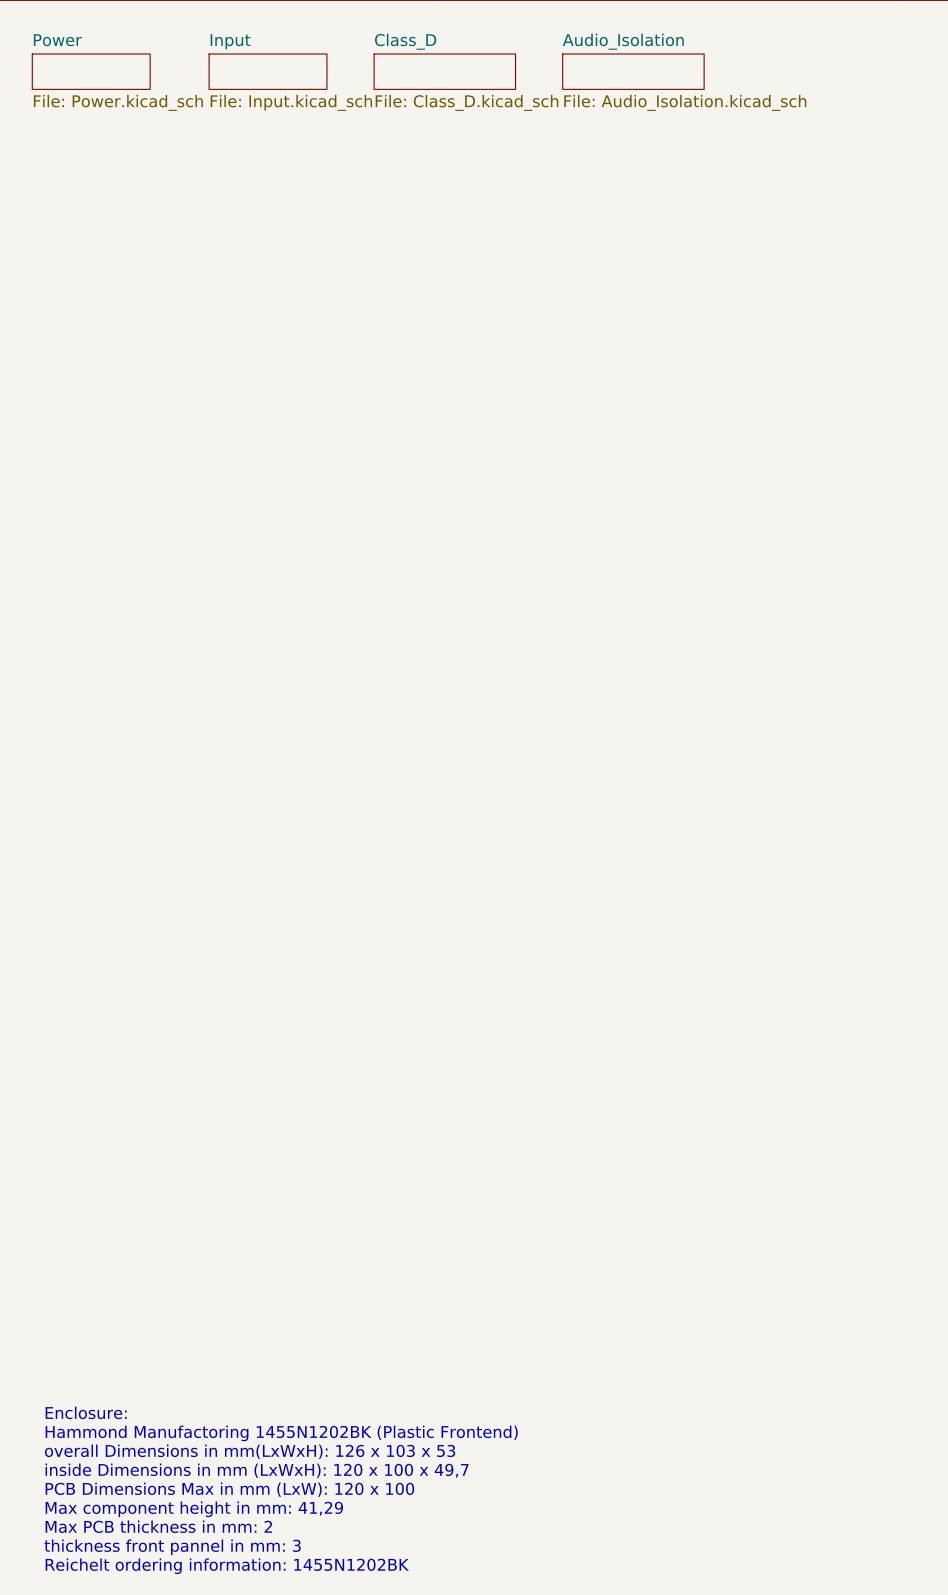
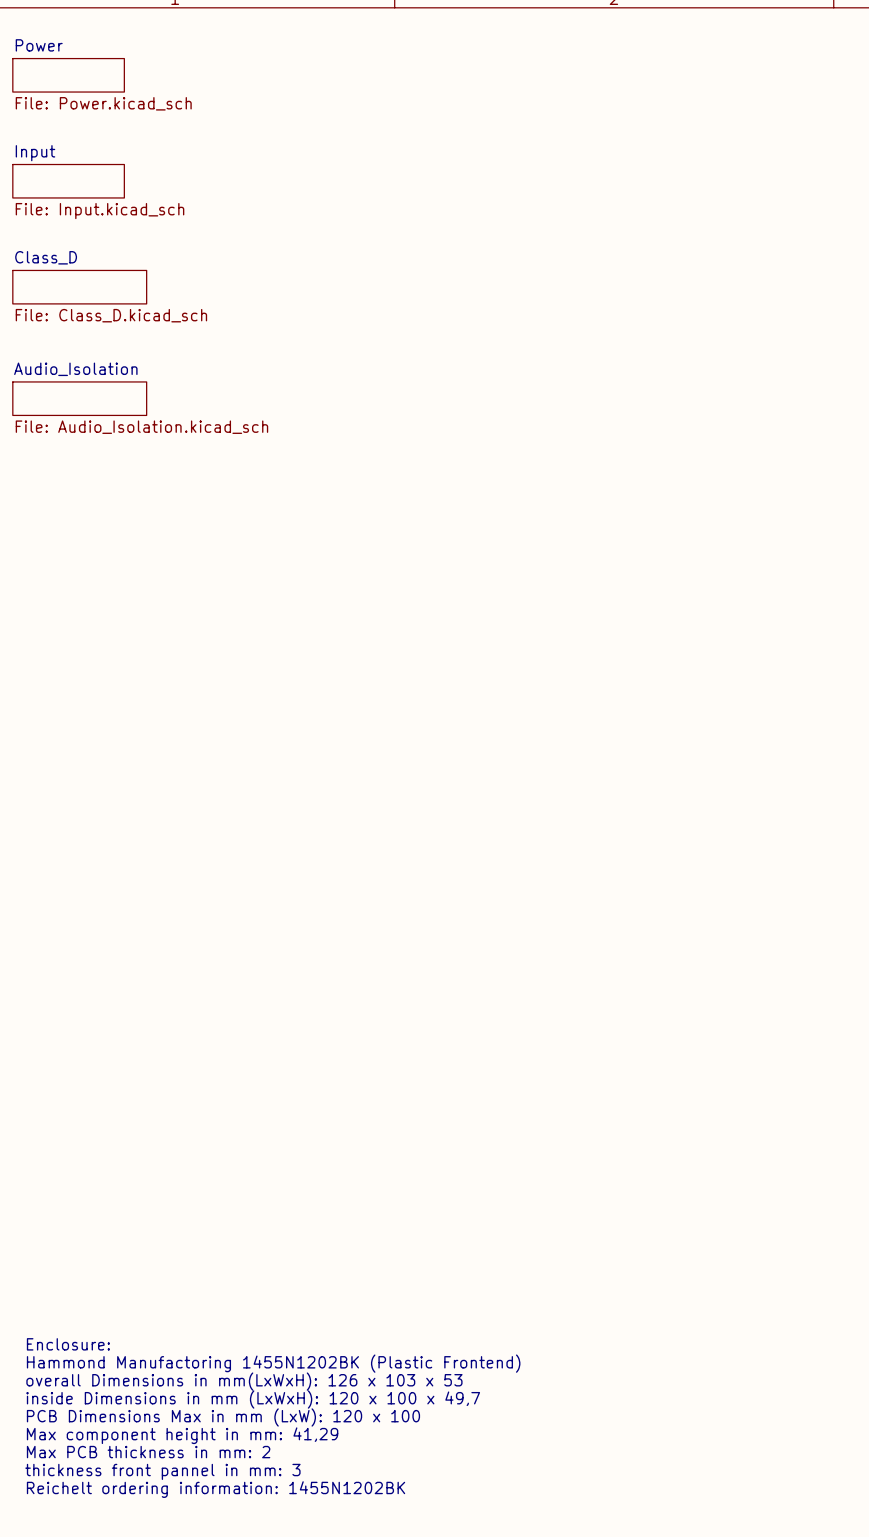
sheet Input position: (268, 71) -> (68, 181)
sheet Class_D: File: Class_D.kicad_sch (444, 71) -> none
sheet Audio_Isolation: File: Audio_Isolation.kicad_sch (633, 71) -> none
sheet Class_D: none -> File: Class_D.kicad_sch (79, 287)
sheet Audio_Isolation: none -> File: Audio_Isolation.kicad_sch (79, 398)

